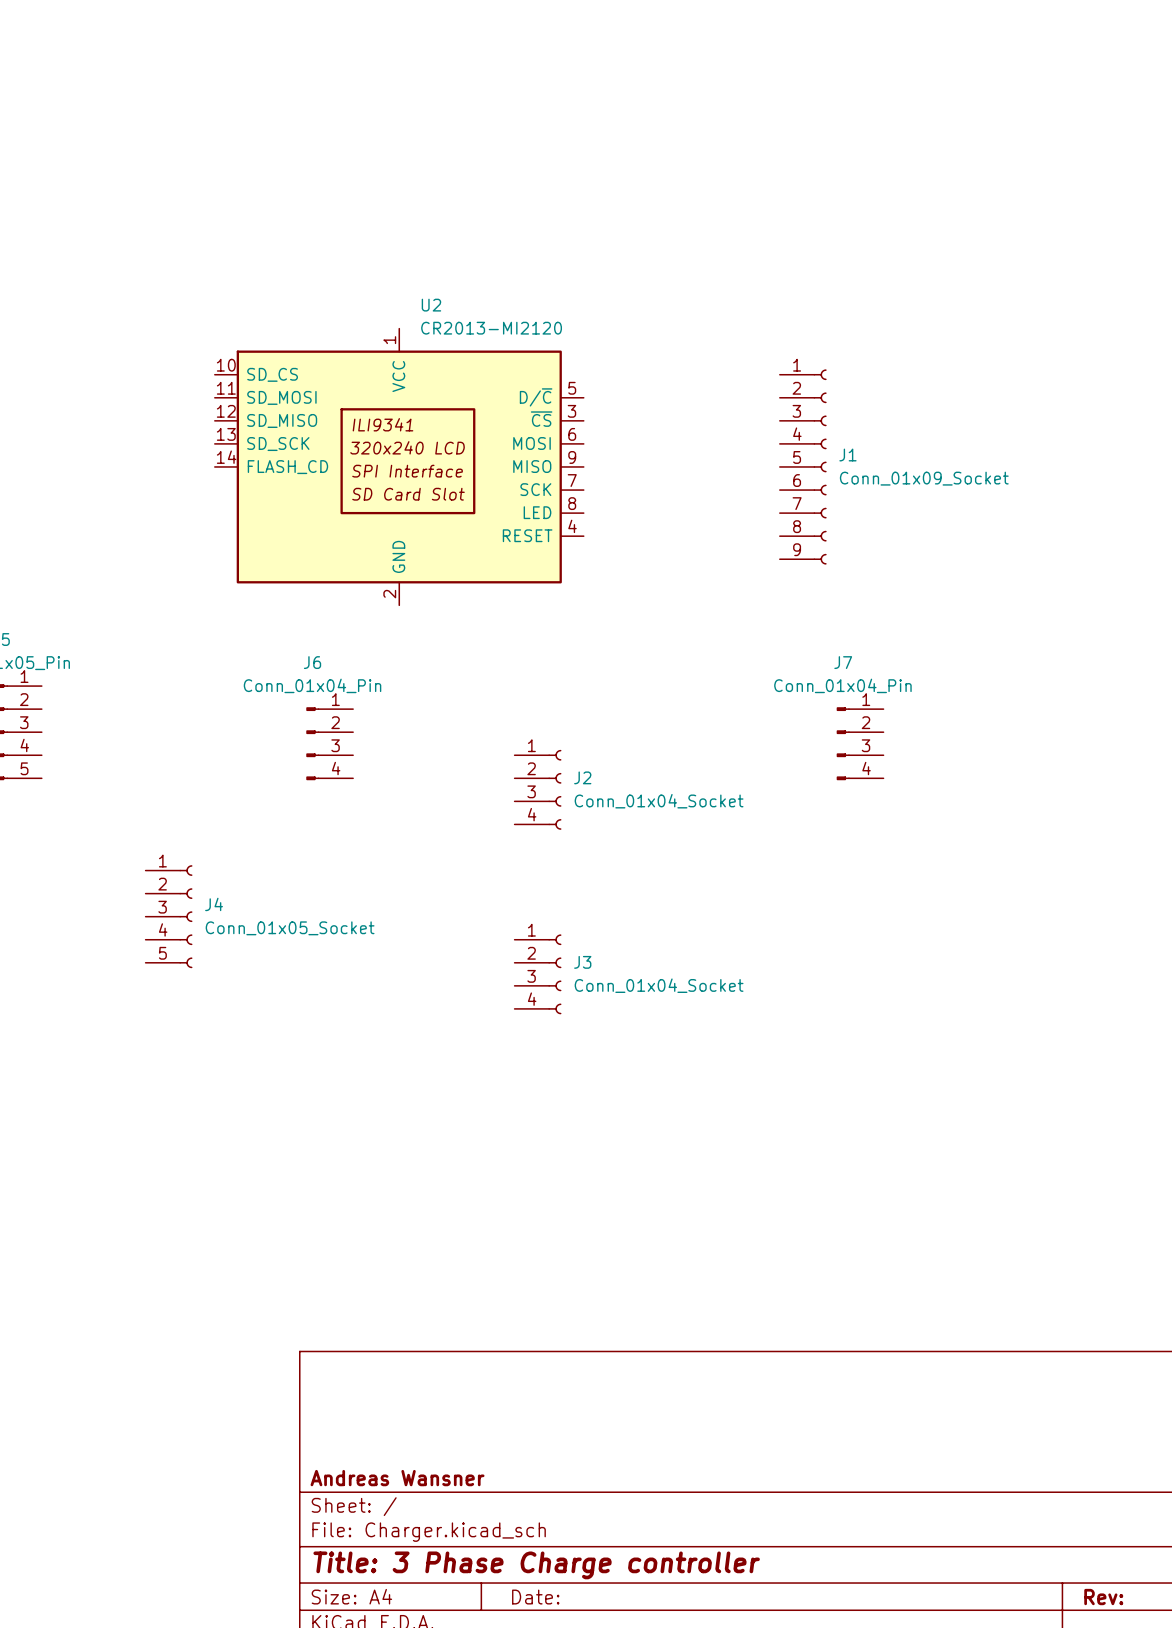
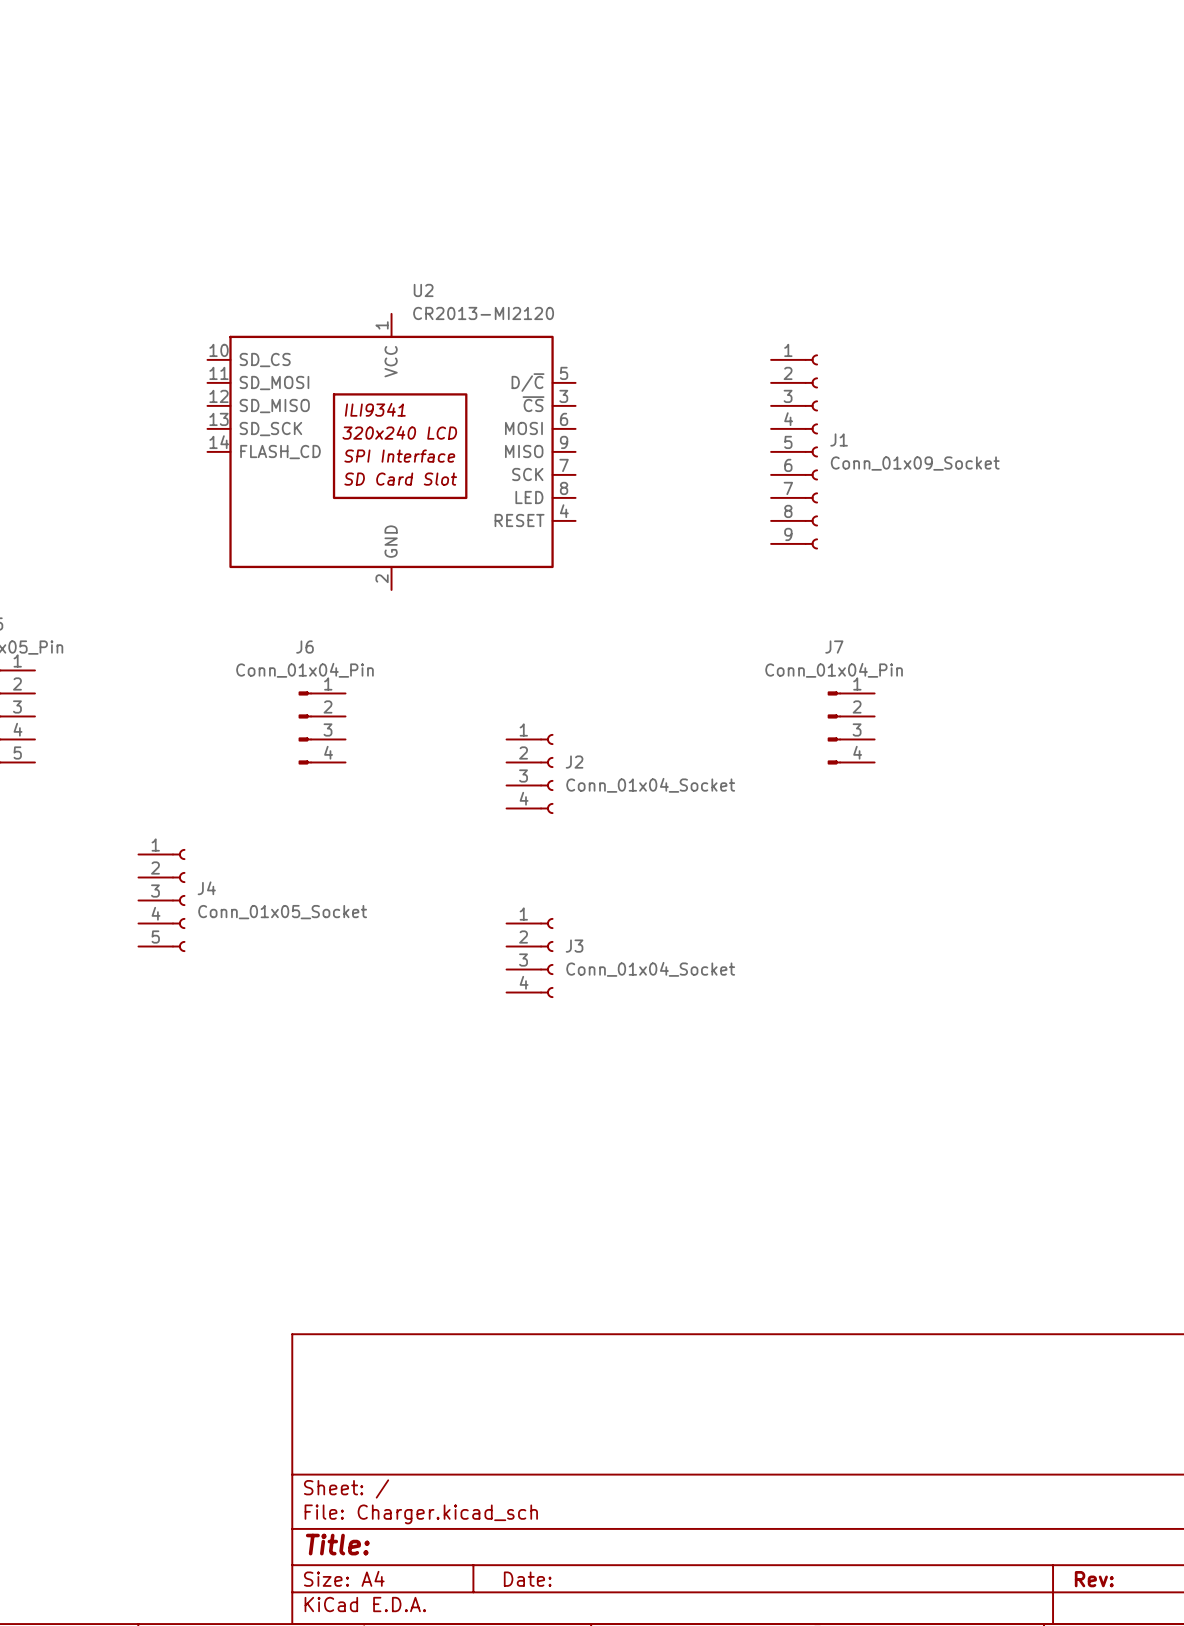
title block: Andreas Wansner (397, 1478) -> none
title block: Title: 3 Phase Charge controller (536, 1565) -> Title: (337, 1544)

